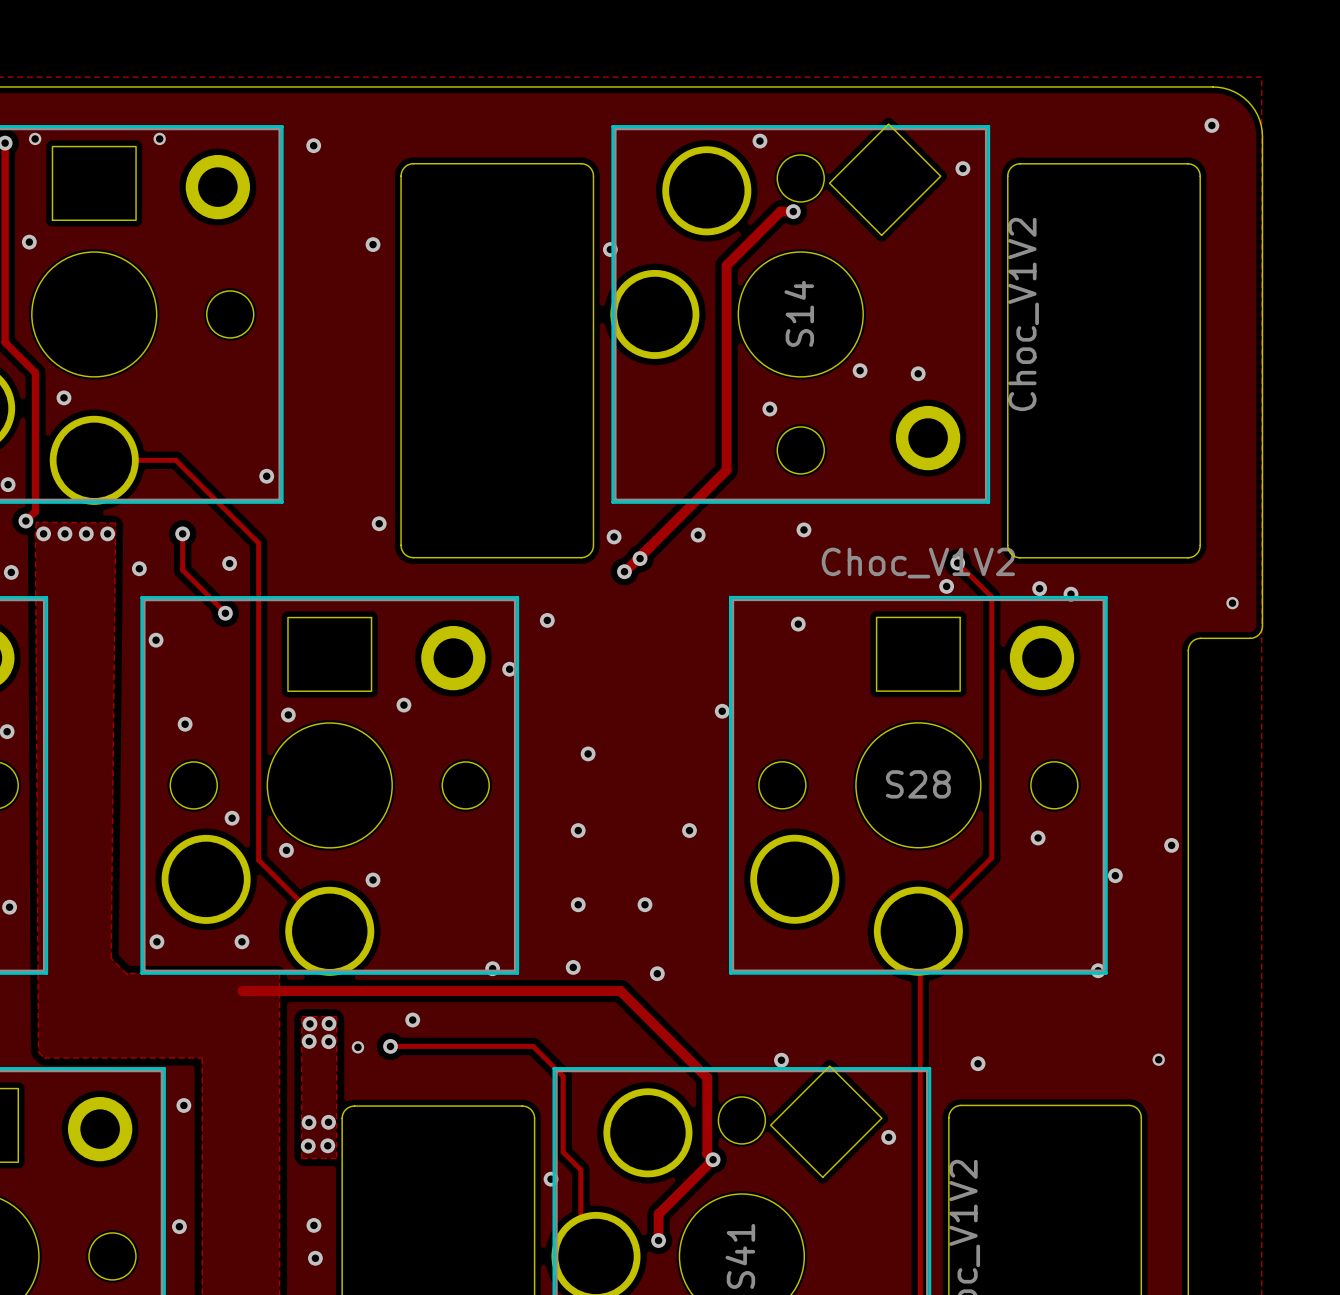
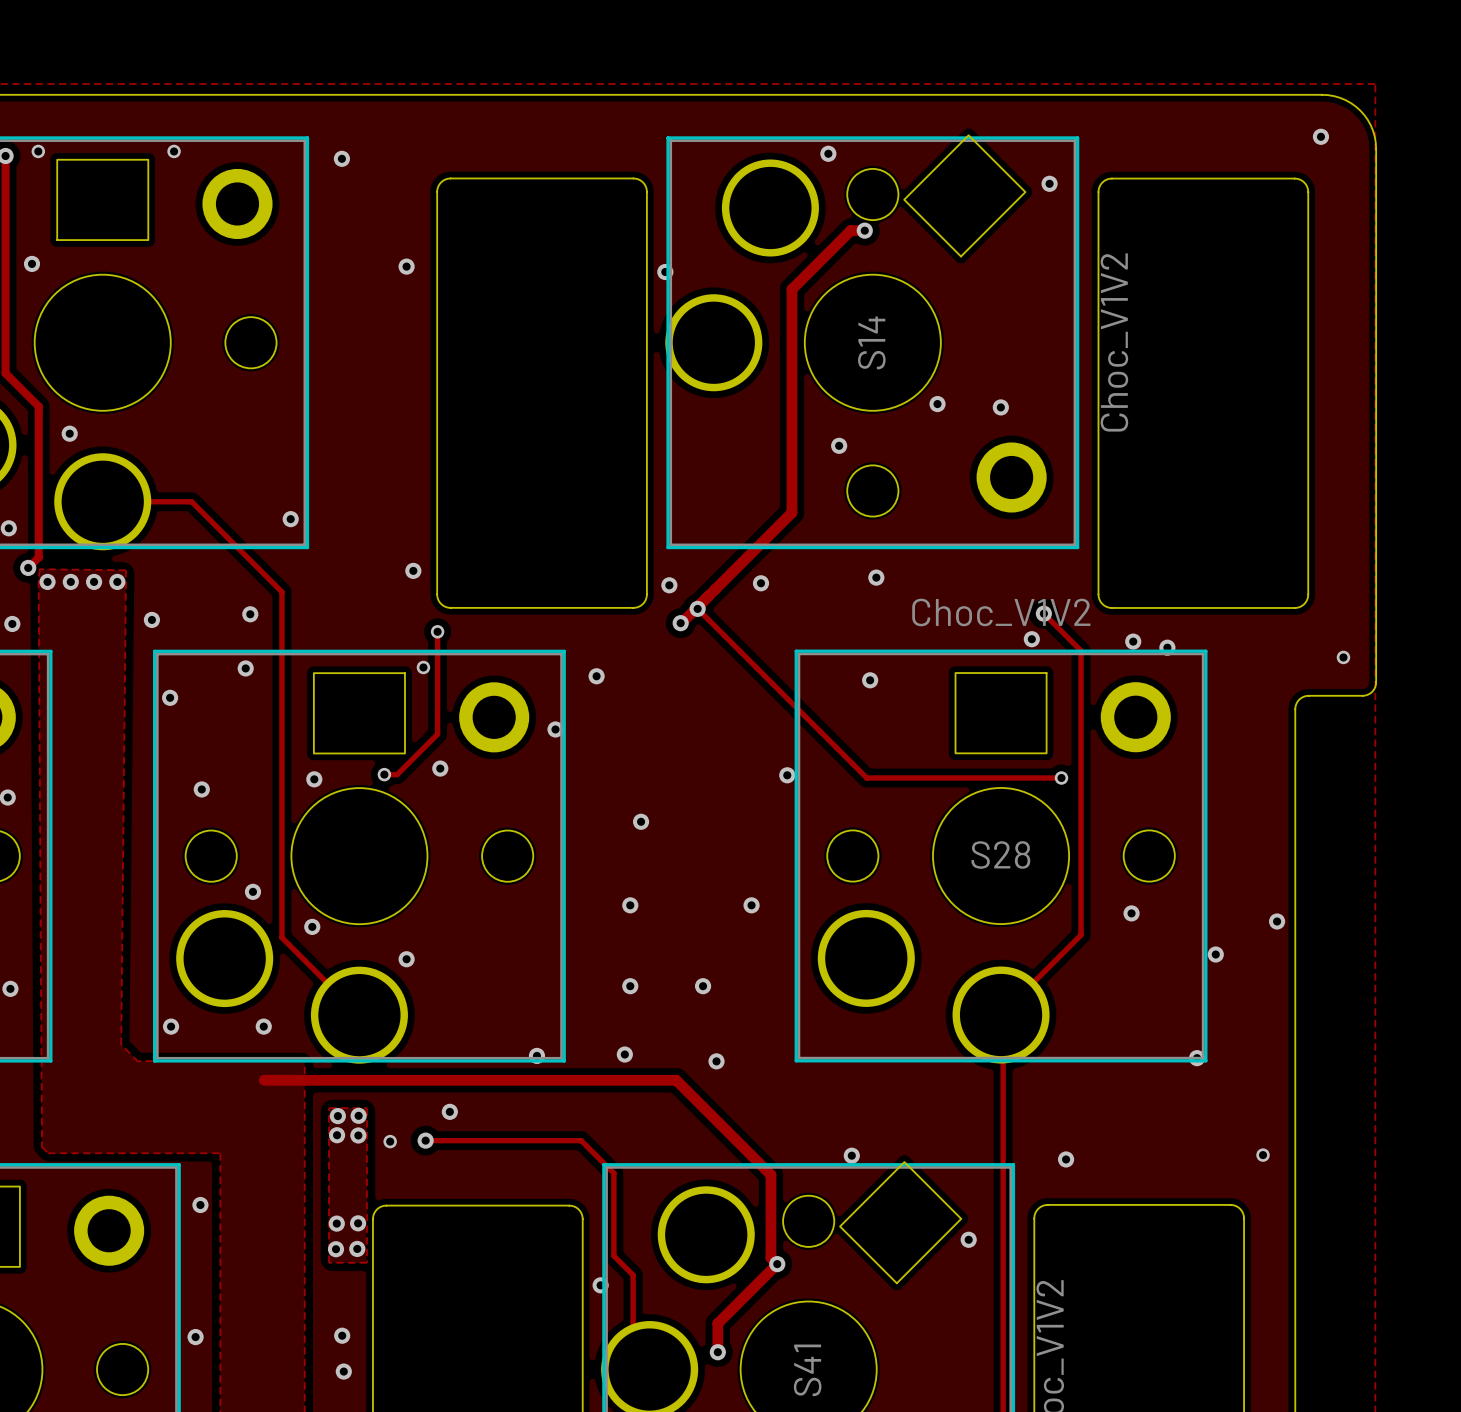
track: (182, 533) (182, 570) (225, 612) -> none
via: (182, 533) -> none
track: none -> (697, 608) (866, 777) (1061, 777)
track: none -> (437, 631) (437, 734) (397, 774) (384, 774)
via: none -> (437, 631)
via: none -> (423, 667)
via: none -> (384, 774)
via: none -> (1061, 777)

